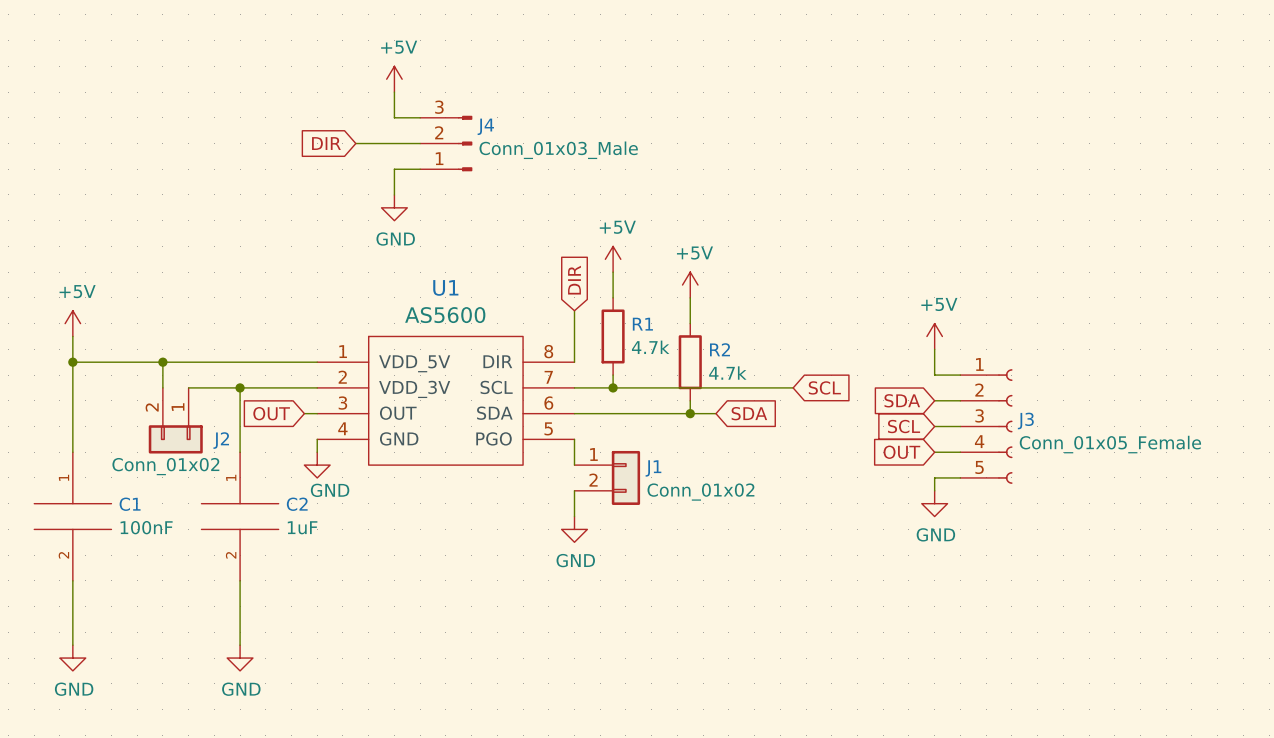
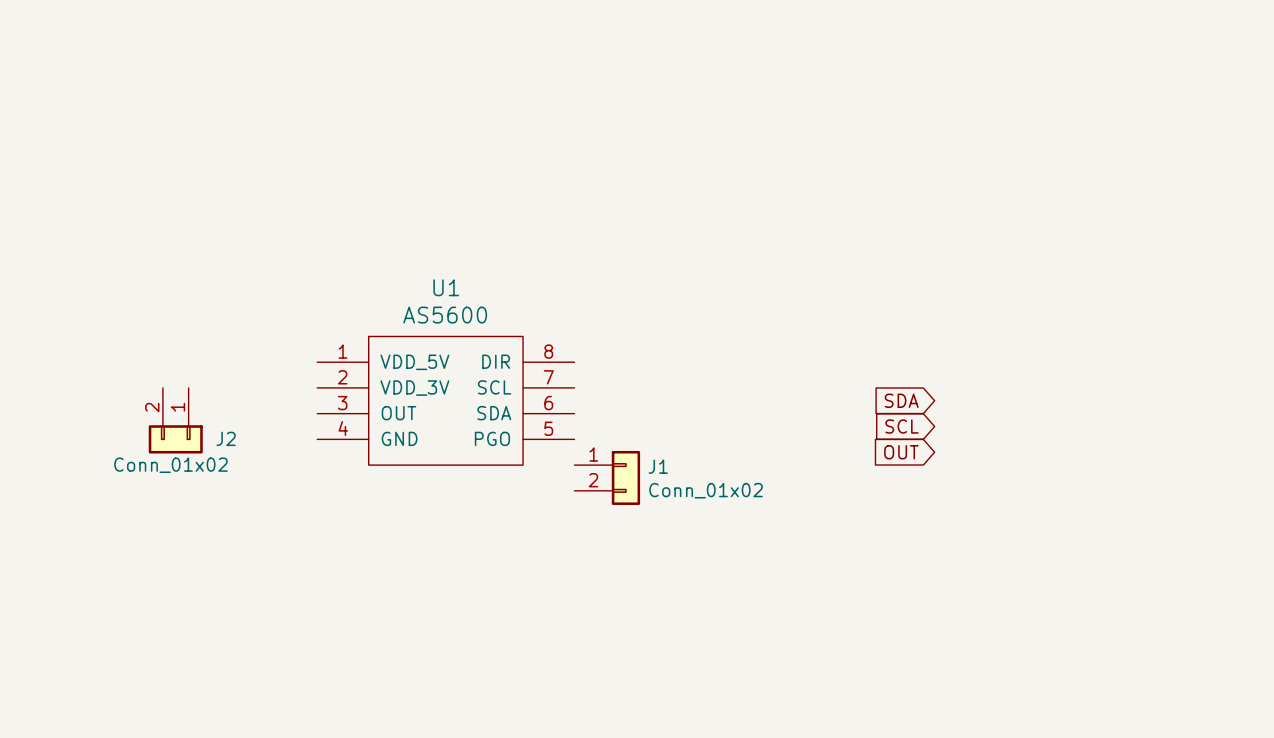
power symbol: +5V (394, 79) -> none
wire: (394, 92) (394, 117) (420, 117) -> none
global label: DIR (326, 143) -> none
wire: (355, 143) (420, 143) -> none
J4: Conn_01x03_Male (446, 143) -> none
wire: (420, 169) (394, 169) (394, 194) -> none
power symbol: GND (394, 207) -> none
power symbol: +5V (613, 259) -> none
wire: (613, 272) (613, 297) -> none
global label: DIR (574, 280) -> none
power symbol: +5V (690, 285) -> none
wire: (690, 297) (690, 323) -> none
wire: (574, 310) (574, 362) -> none
power symbol: +5V (72, 323) -> none
wire: (72, 336) (72, 452) -> none
R1: 4.7k (613, 336) -> none
power symbol: +5V (934, 336) -> none
wire: (934, 349) (934, 375) (960, 375) -> none
wire: (72, 362) (317, 362) -> none
junction: (72, 362) -> none
wire: (162, 362) (162, 387) -> none
junction: (162, 362) -> none
R2: 4.7k (690, 362) -> none
wire: (613, 375) (613, 387) -> none
wire: (188, 387) (317, 387) -> none
wire: (240, 387) (240, 452) -> none
junction: (240, 387) -> none
wire: (574, 387) (793, 387) -> none
junction: (613, 387) -> none
global label: SCL (824, 387) -> none
wire: (690, 400) (690, 413) -> none
wire: (934, 400) (960, 400) -> none
global label: OUT (271, 413) -> none
wire: (304, 413) (317, 413) -> none
wire: (574, 413) (715, 413) -> none
junction: (690, 413) -> none
global label: SDA (749, 413) -> none
wire: (934, 426) (960, 426) -> none
J3: Conn_01x05_Female (986, 426) -> none
wire: (317, 439) (317, 452) -> none
wire: (574, 439) (574, 465) -> none
wire: (934, 452) (960, 452) -> none
power symbol: GND (317, 465) -> none
wire: (960, 477) (934, 477) (934, 490) -> none
wire: (574, 490) (574, 516) -> none
power symbol: GND (934, 503) -> none
C1: 100nF (72, 516) -> none
C2: 1uF (240, 516) -> none
power symbol: GND (574, 529) -> none
wire: (72, 580) (72, 645) -> none
wire: (240, 580) (240, 645) -> none
power symbol: GND (72, 658) -> none
power symbol: GND (240, 658) -> none

